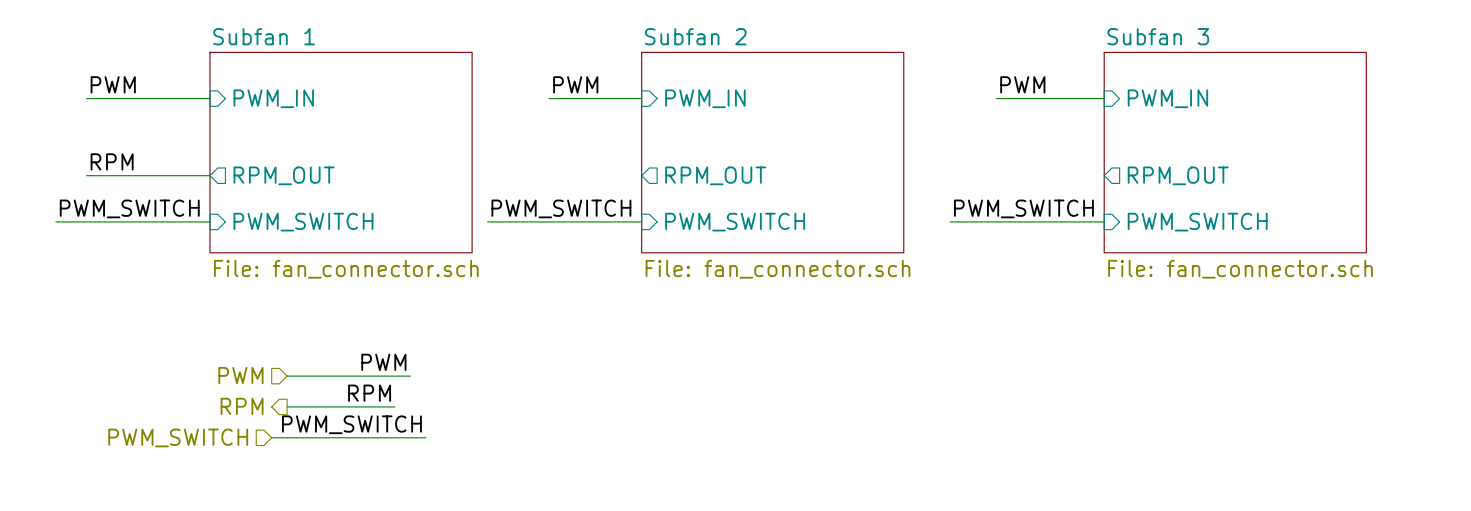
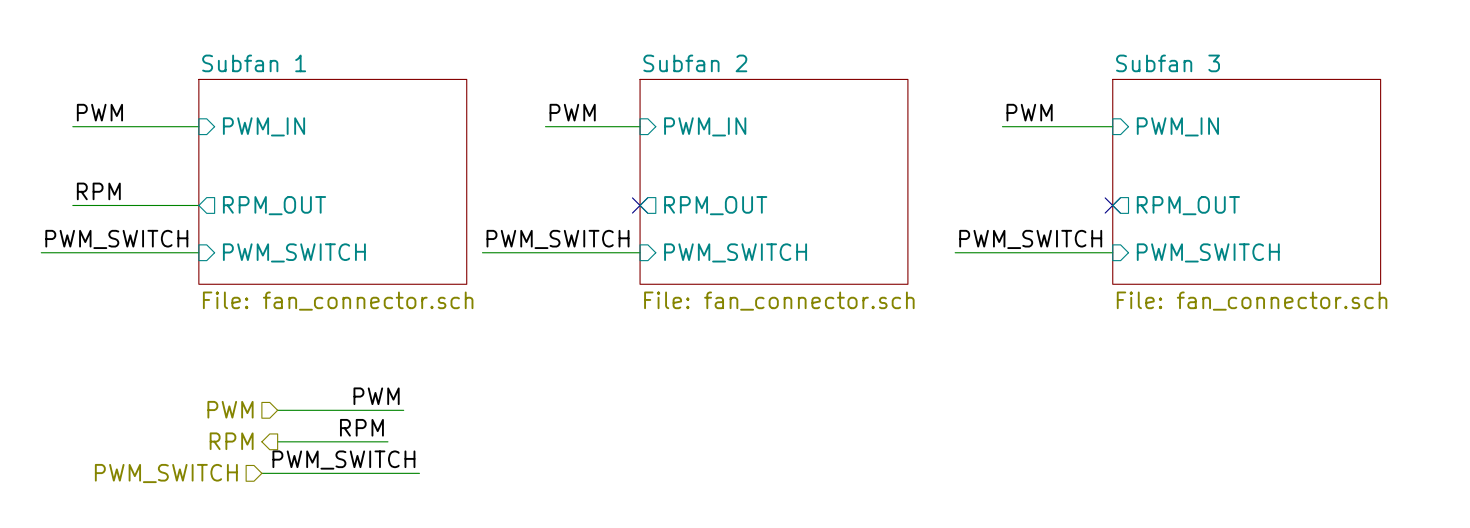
no-connect mark: none -> (640, 205)
no-connect mark: none -> (1112, 205)

